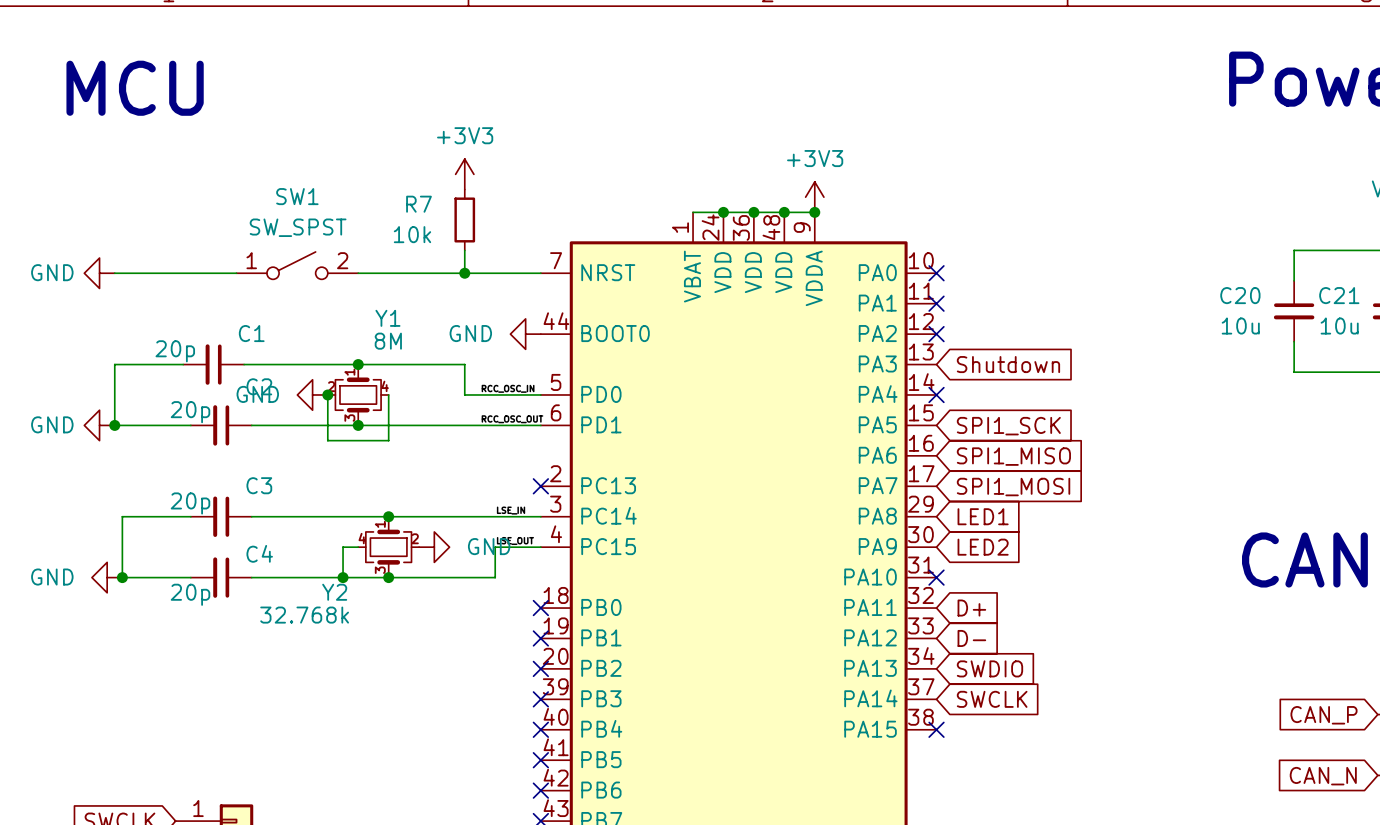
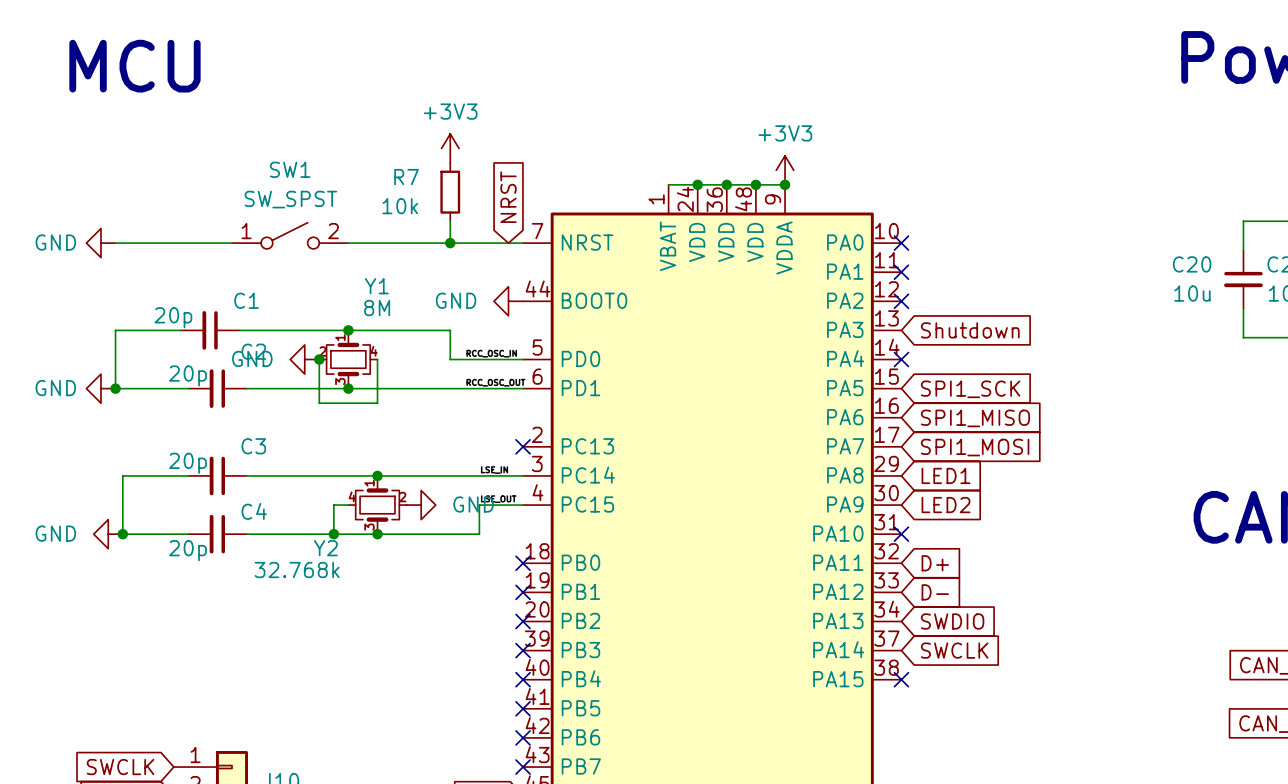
global label: none -> NRST (508, 197)

